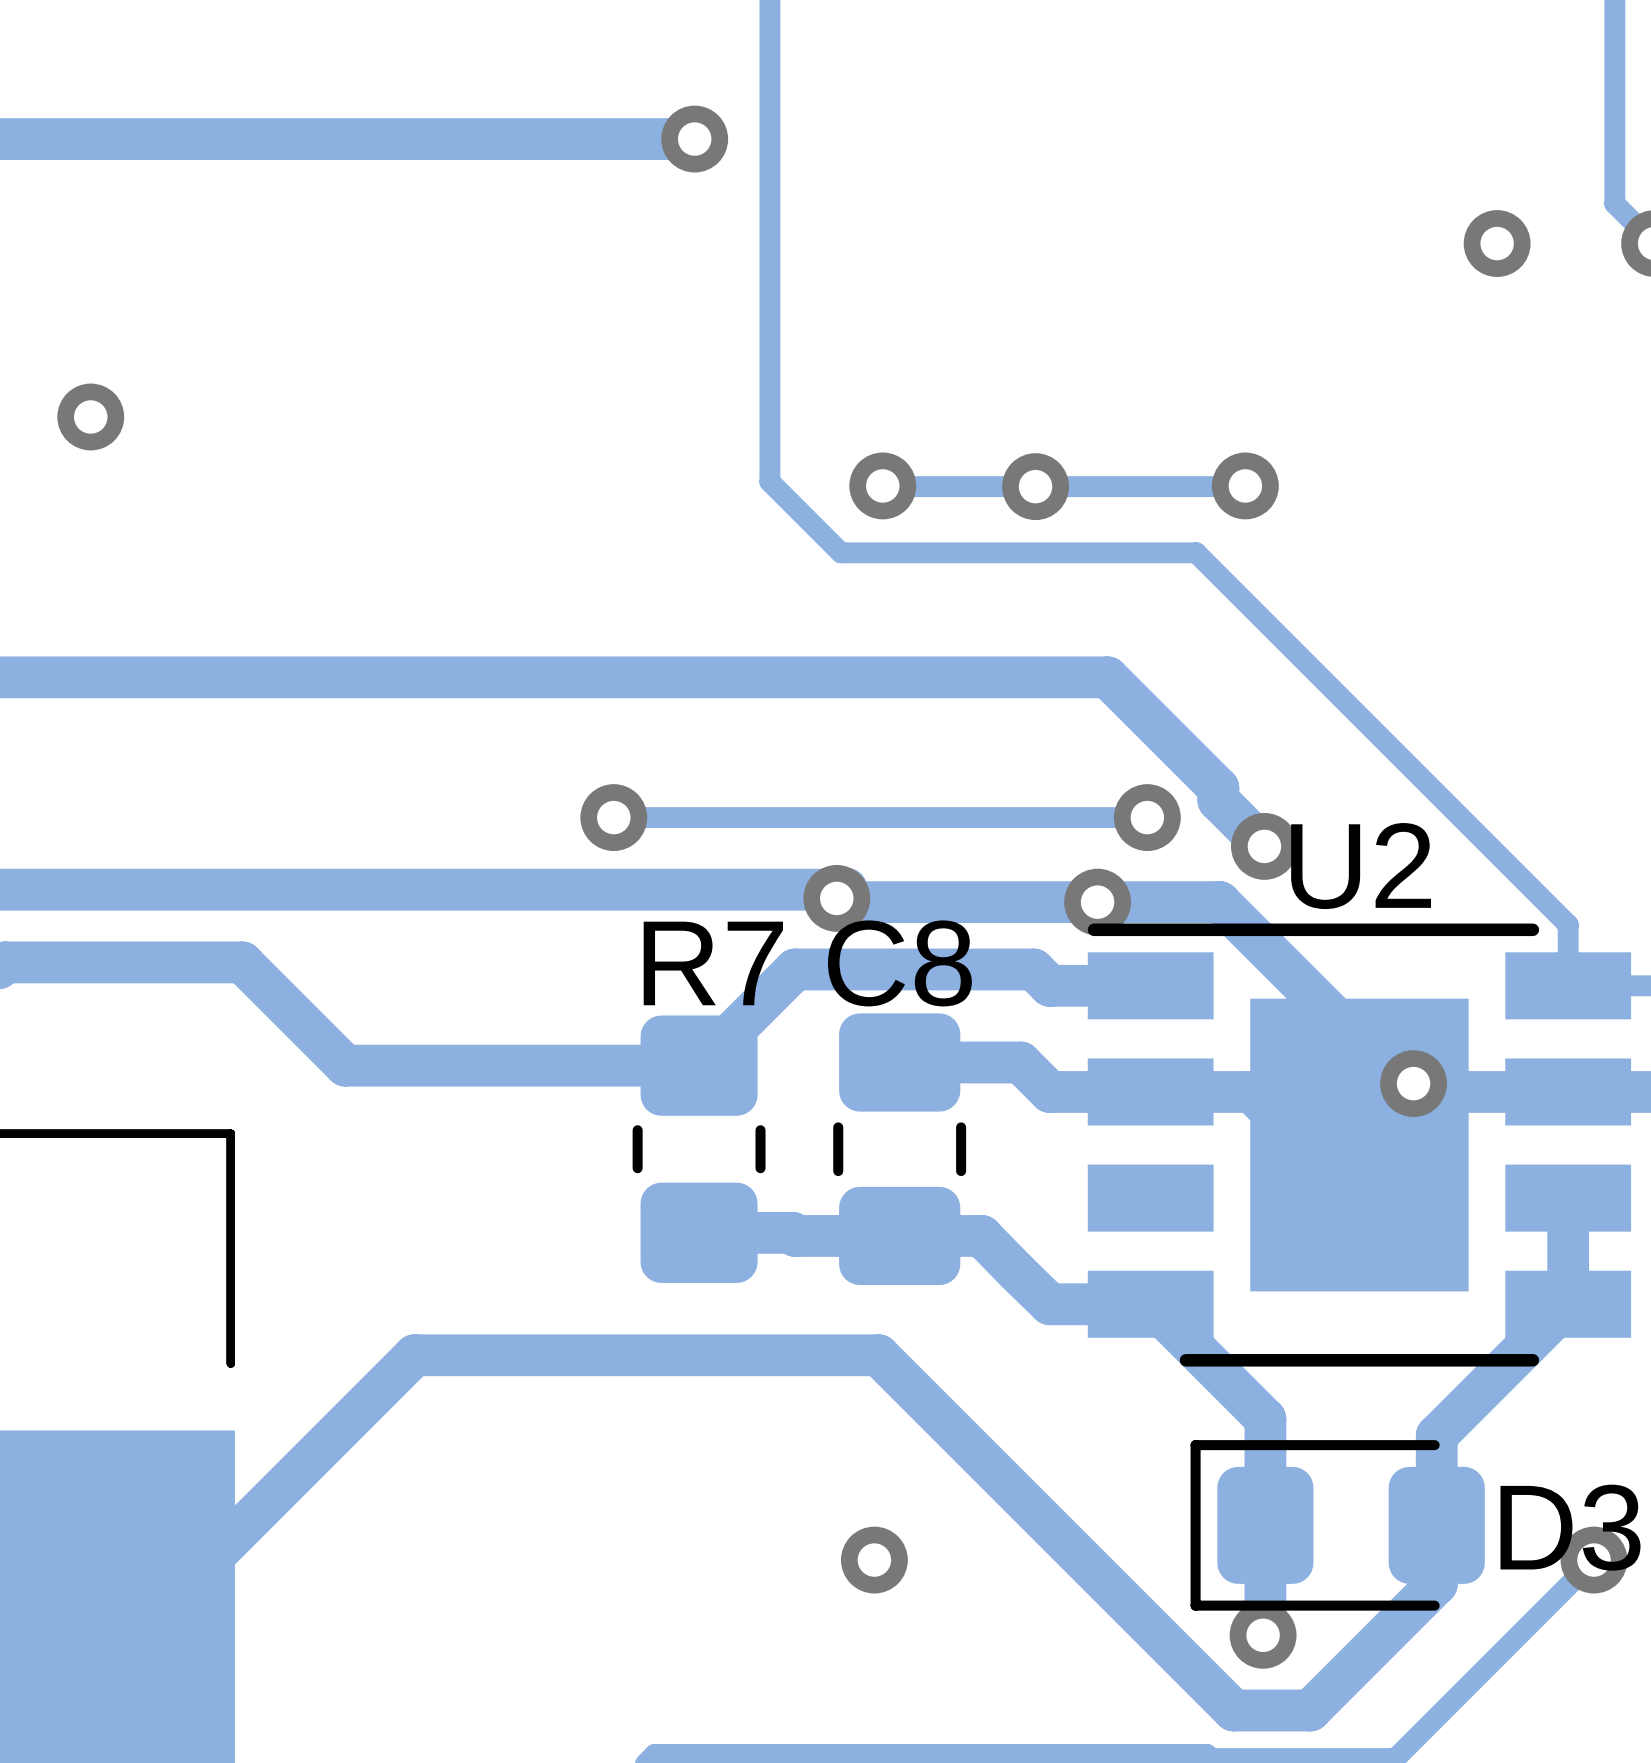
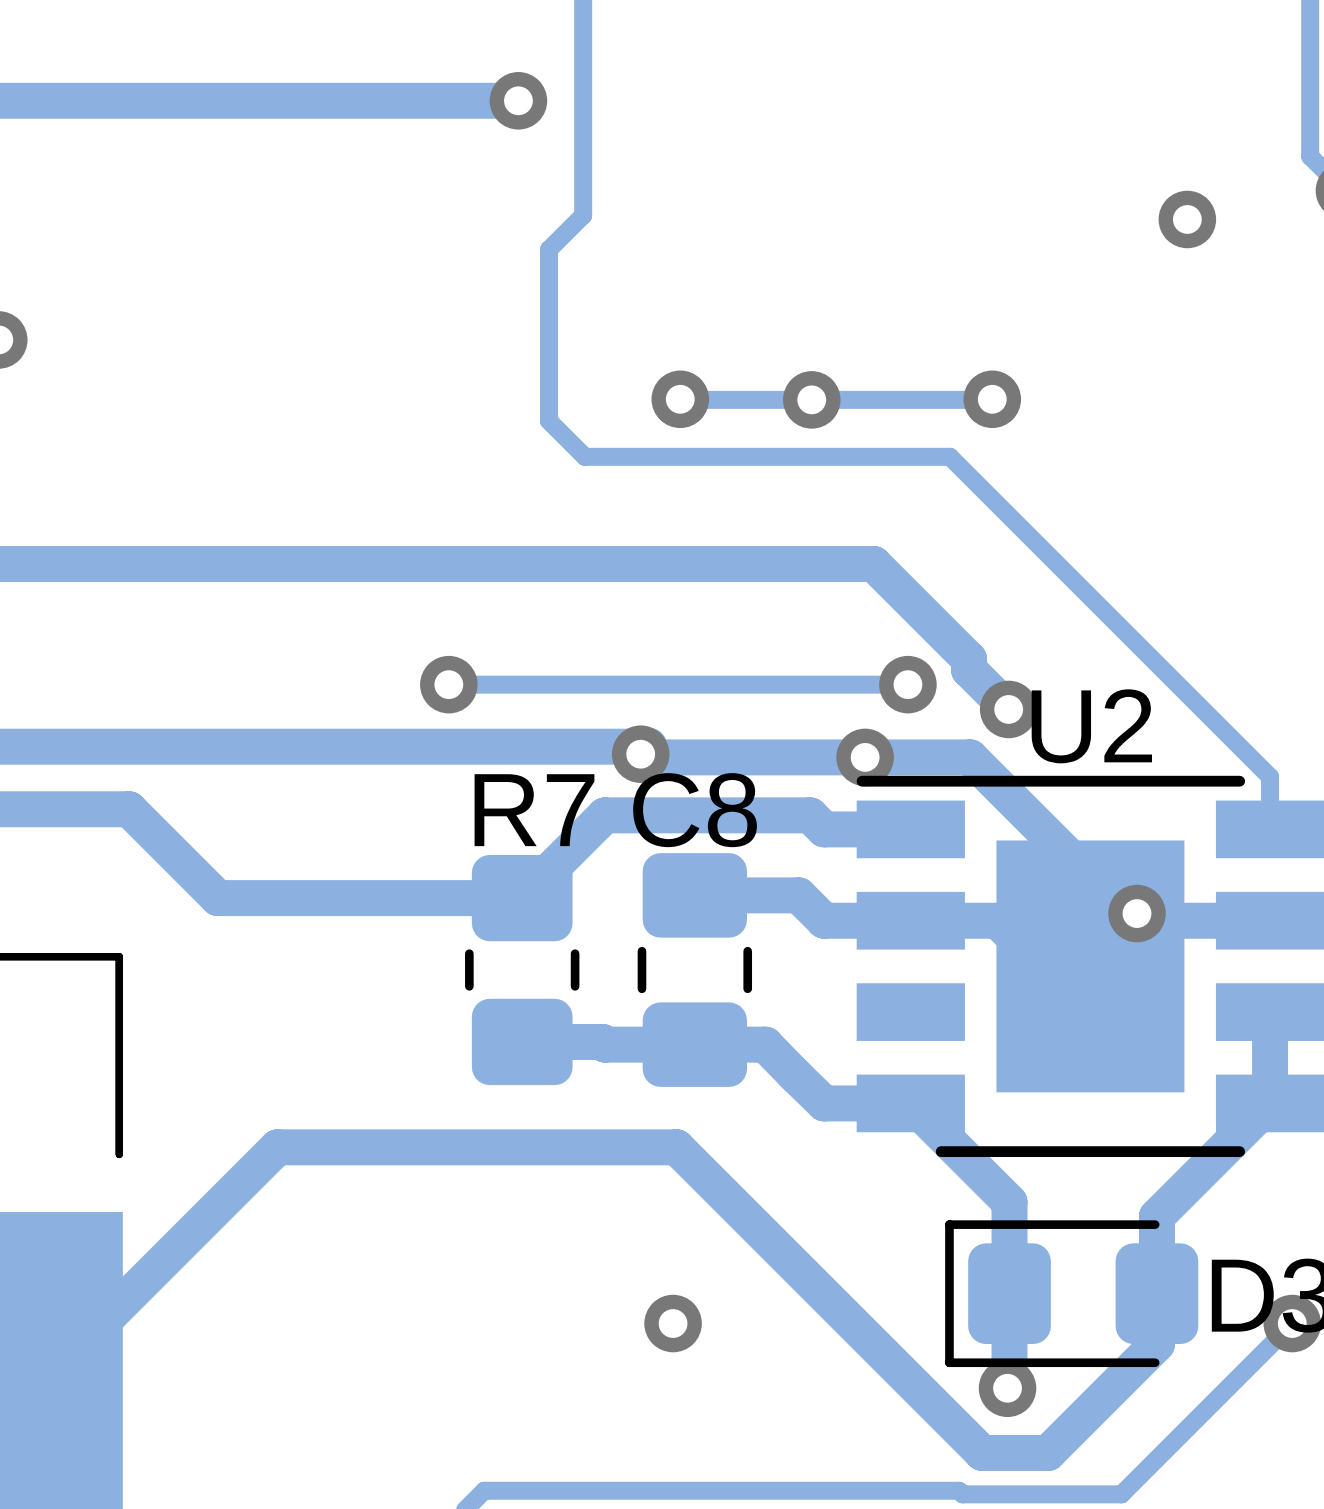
via position: (1497, 243) -> (1187, 219)
track: (769, 272) (769, 481) (840, 552) -> (583, 215) (549, 249) (549, 420) (584, 456) (644, 456)

